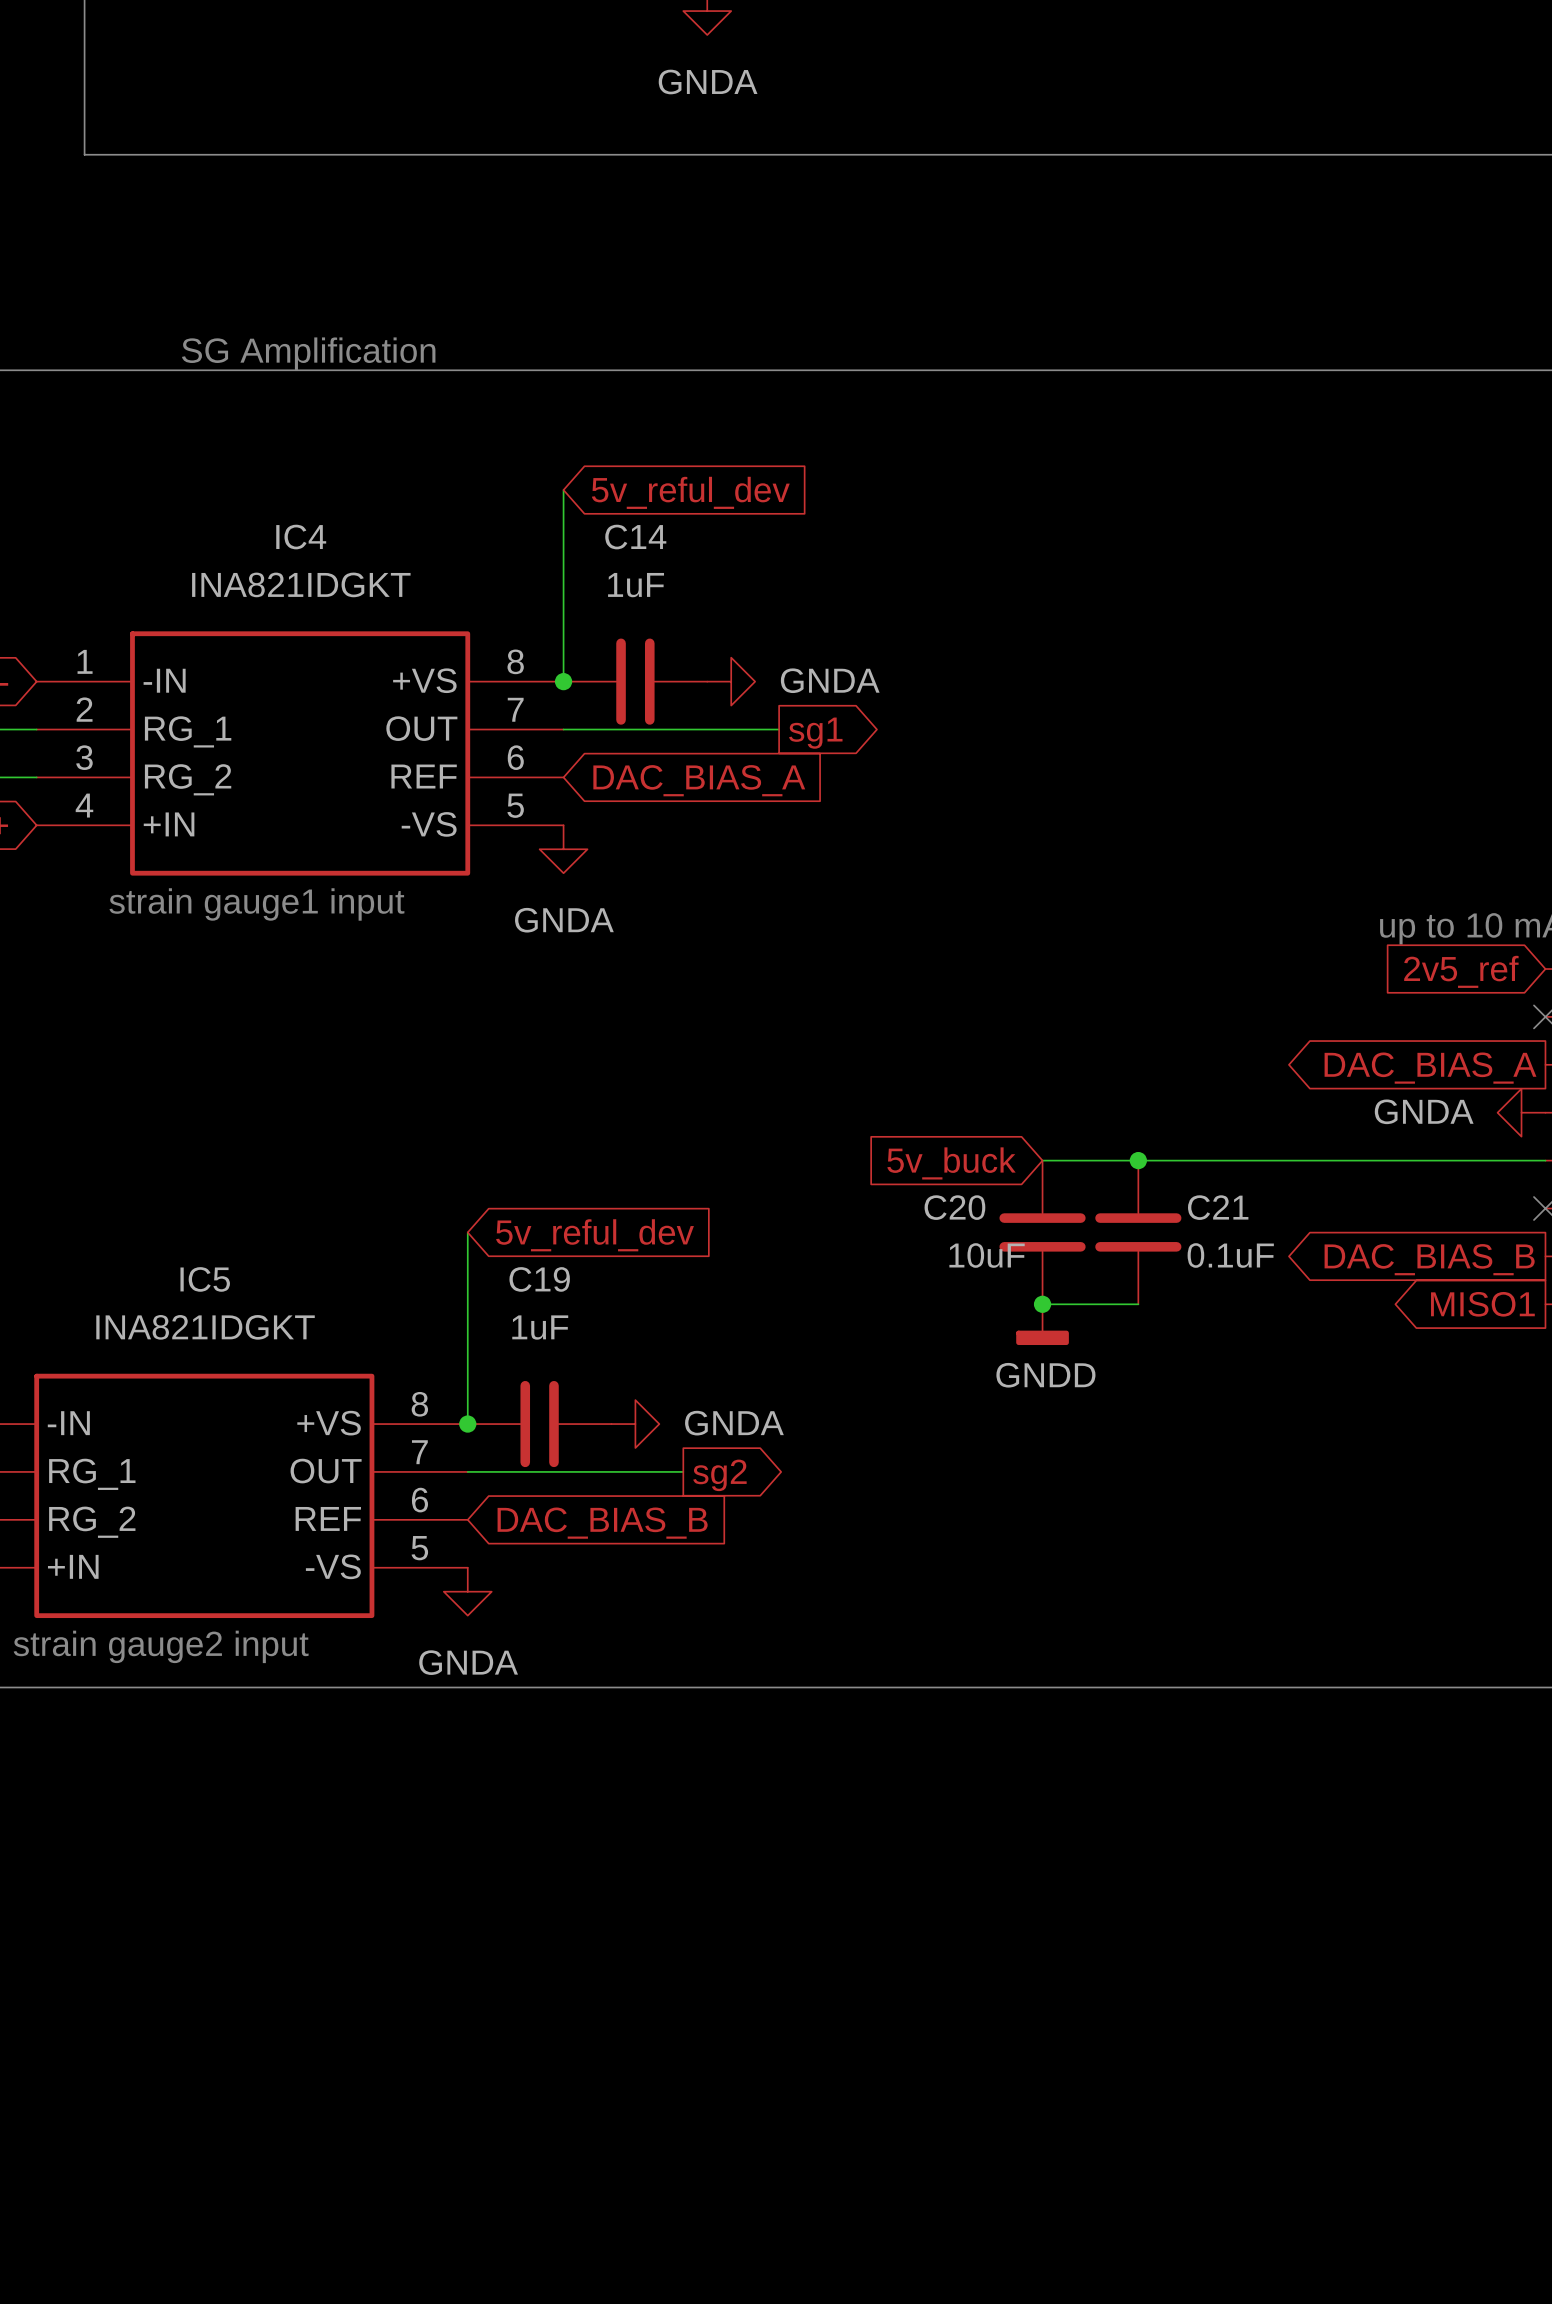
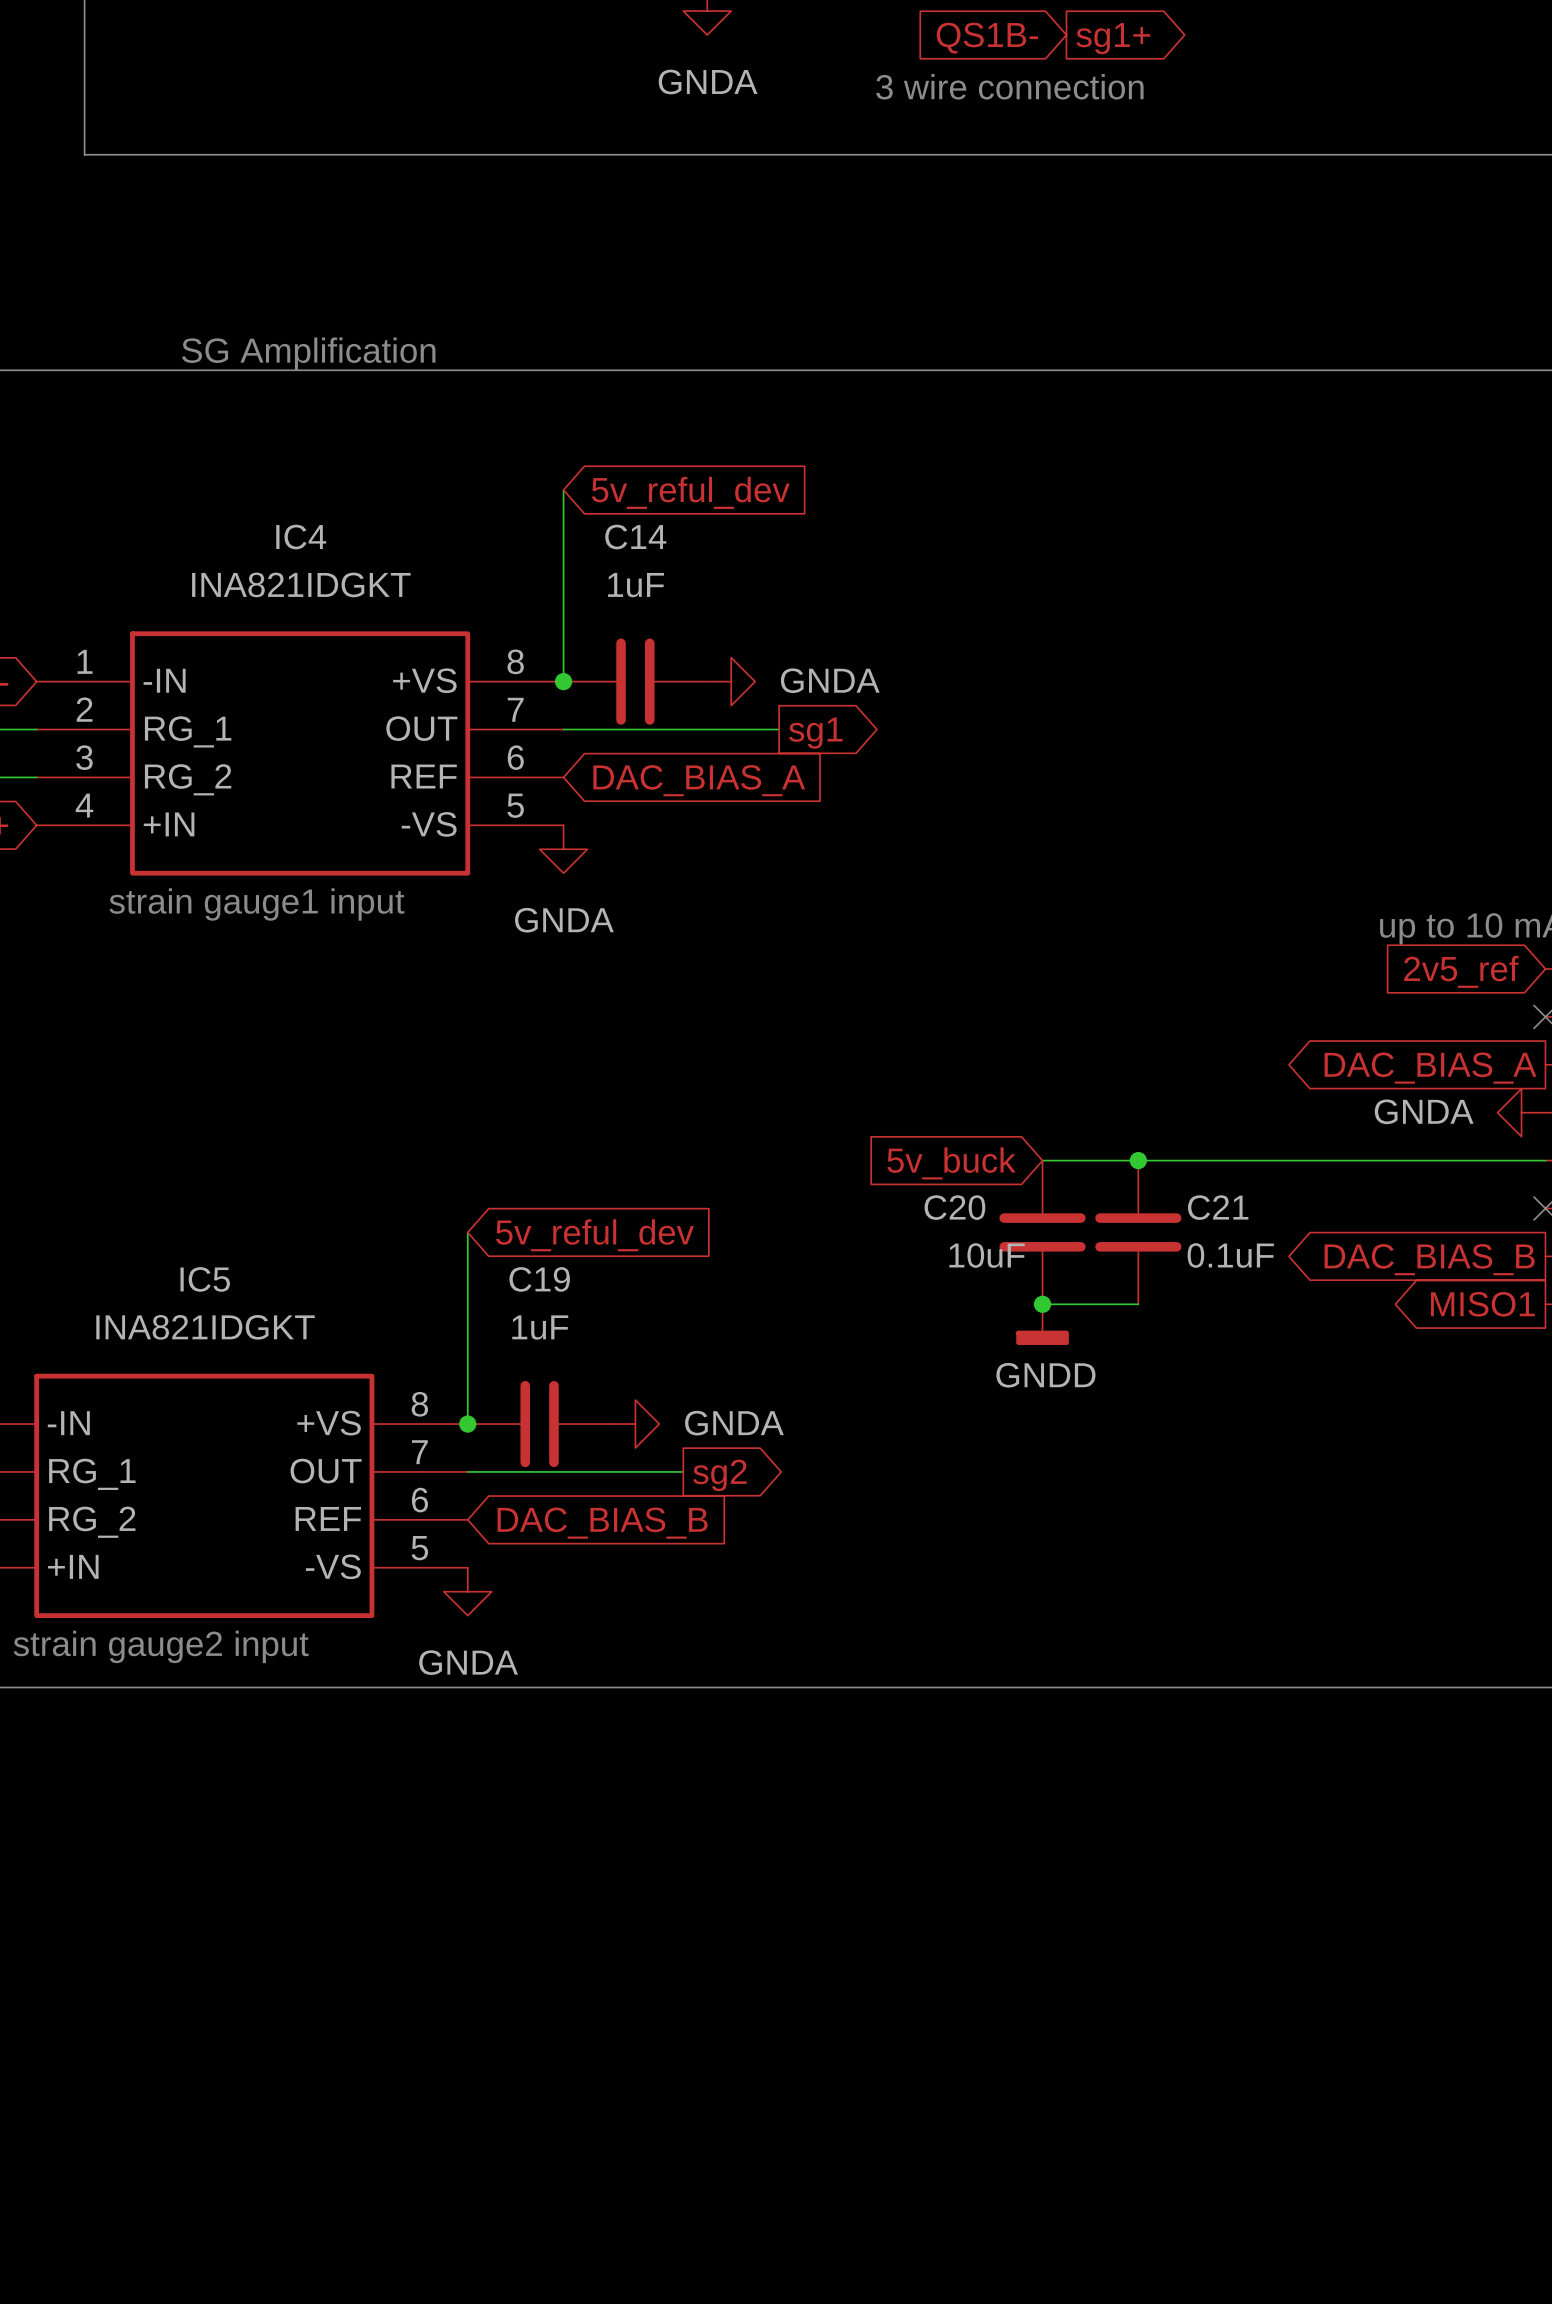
global label: none -> QS1B- (987, 38)
global label: none -> sg1+ (1113, 38)
text: none -> 3 wire connection (1009, 86)

